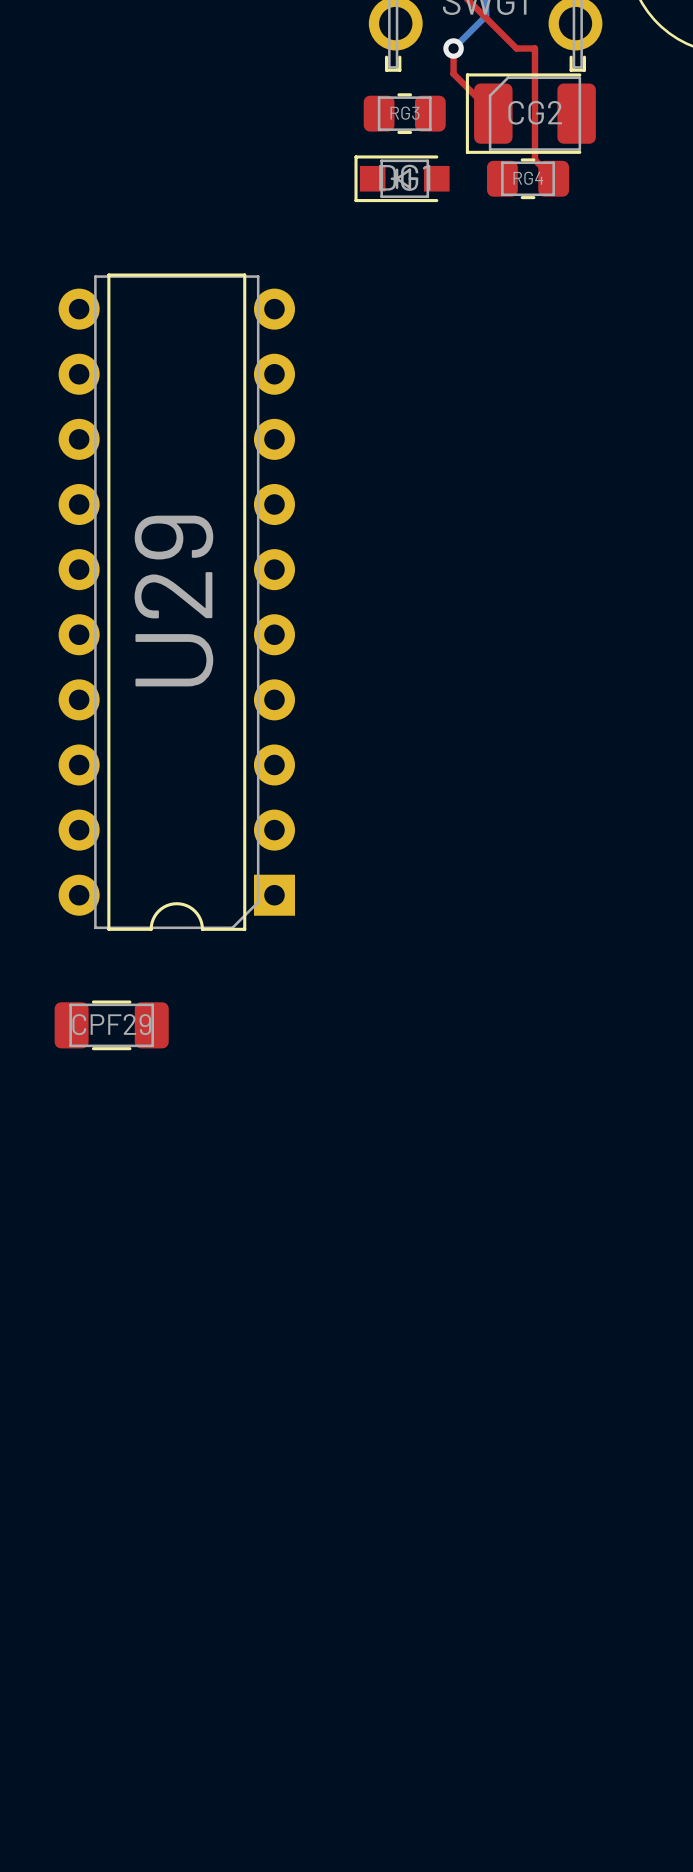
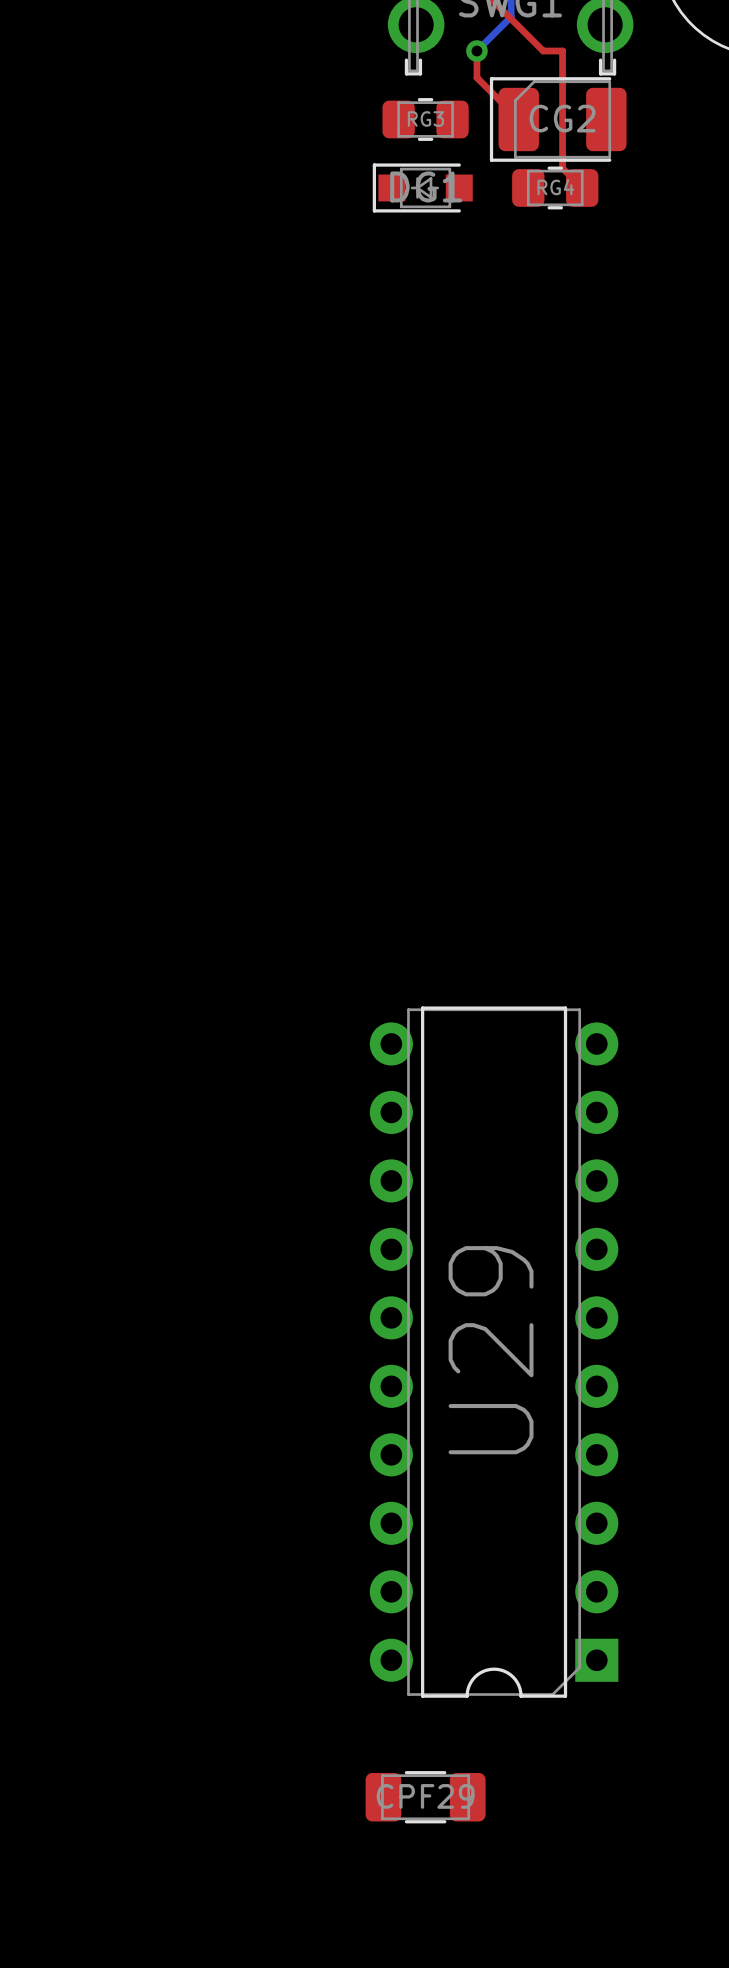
U29 position: (176, 602) -> (494, 1352)
CPF29 position: (111, 1025) -> (425, 1797)

